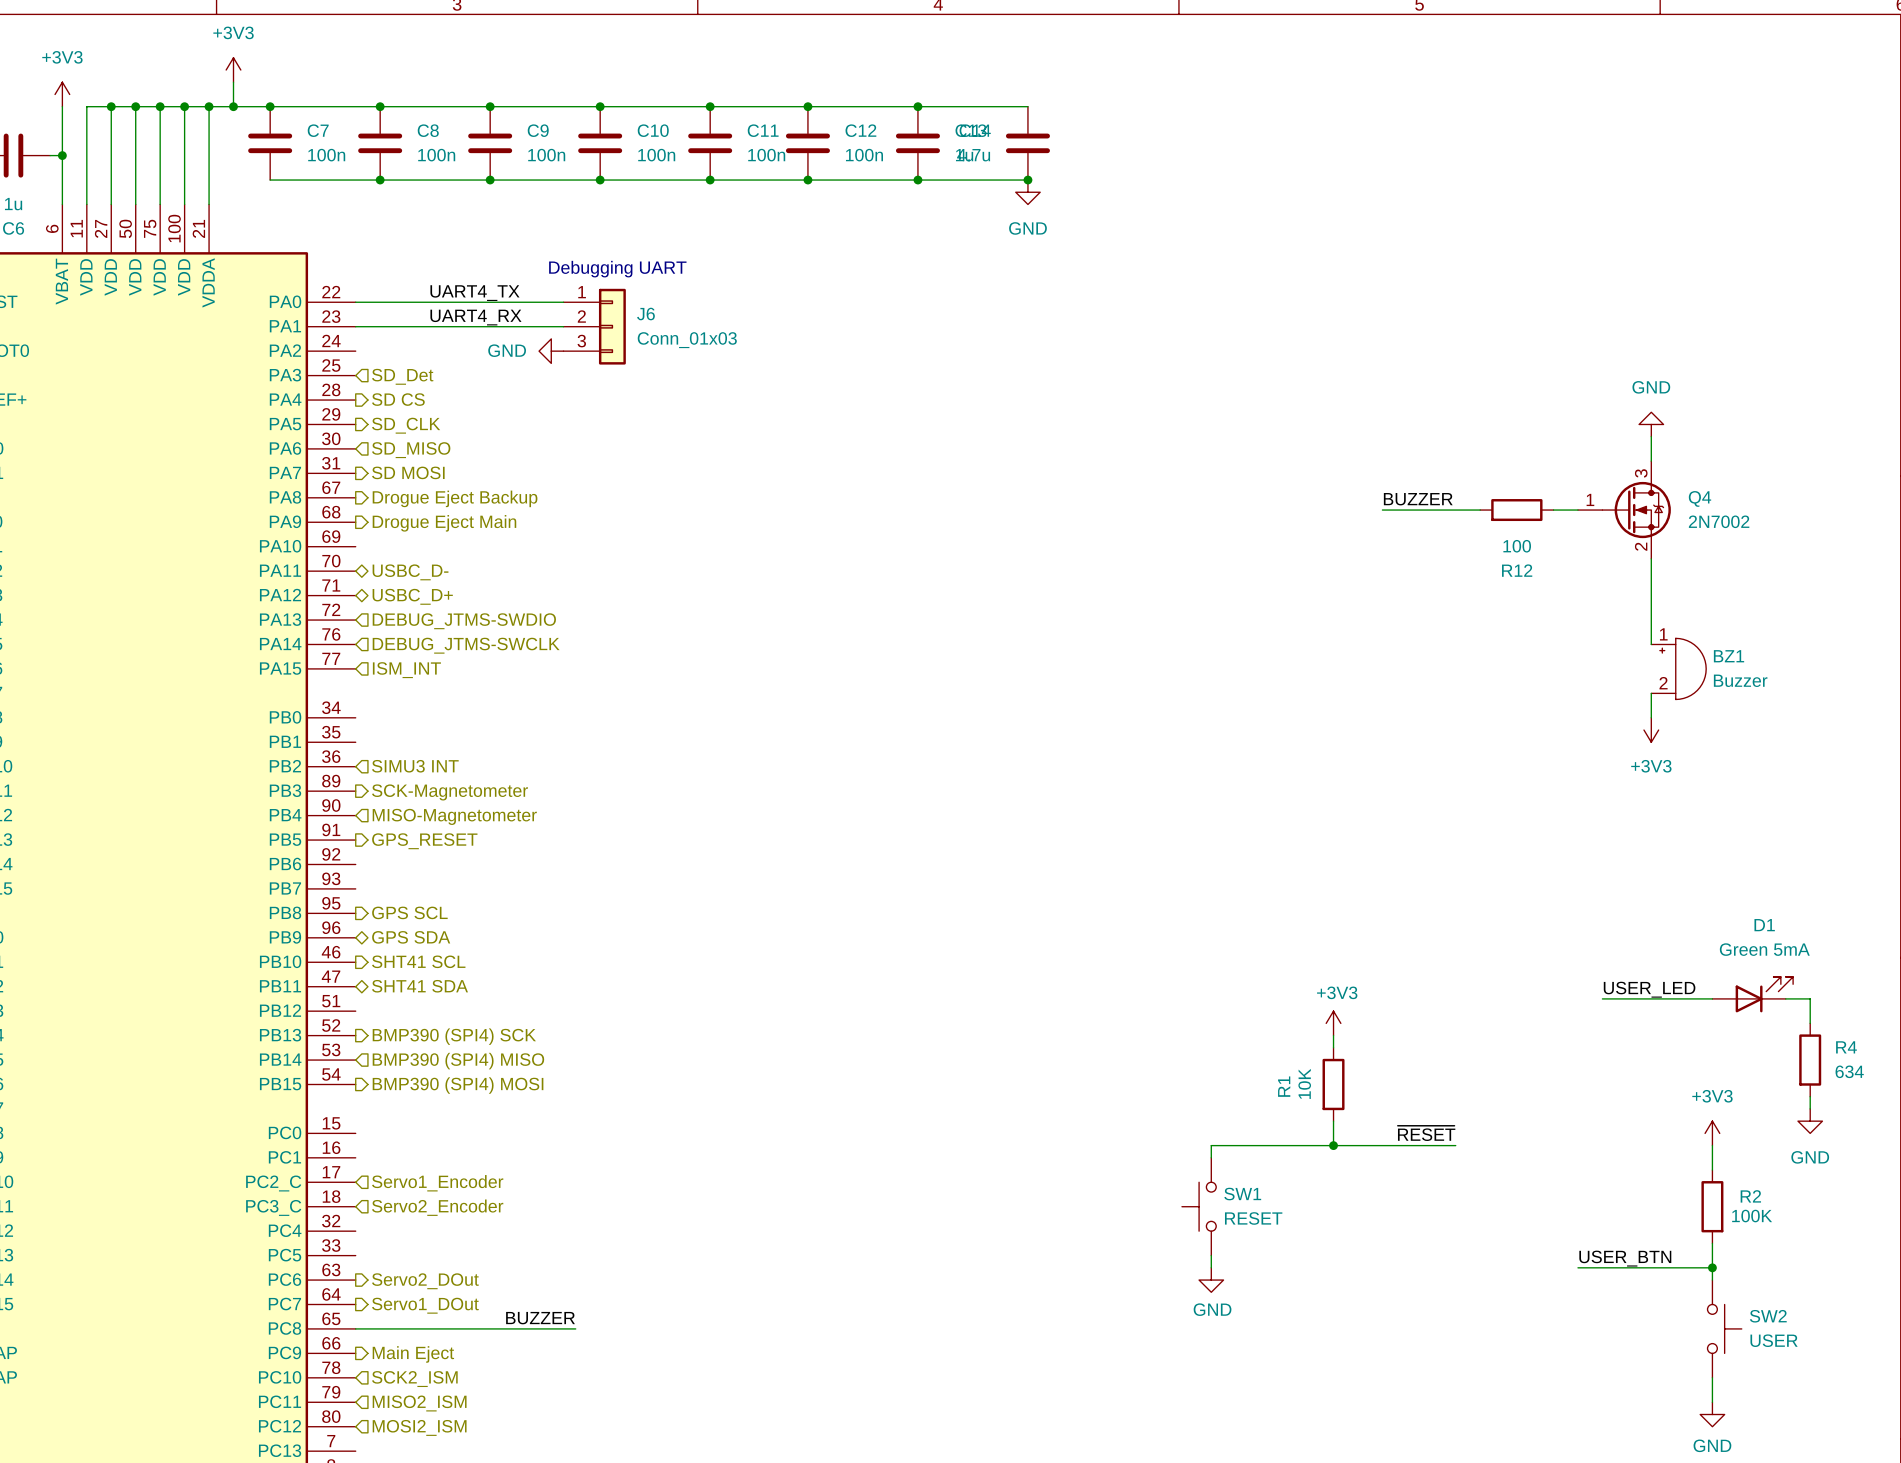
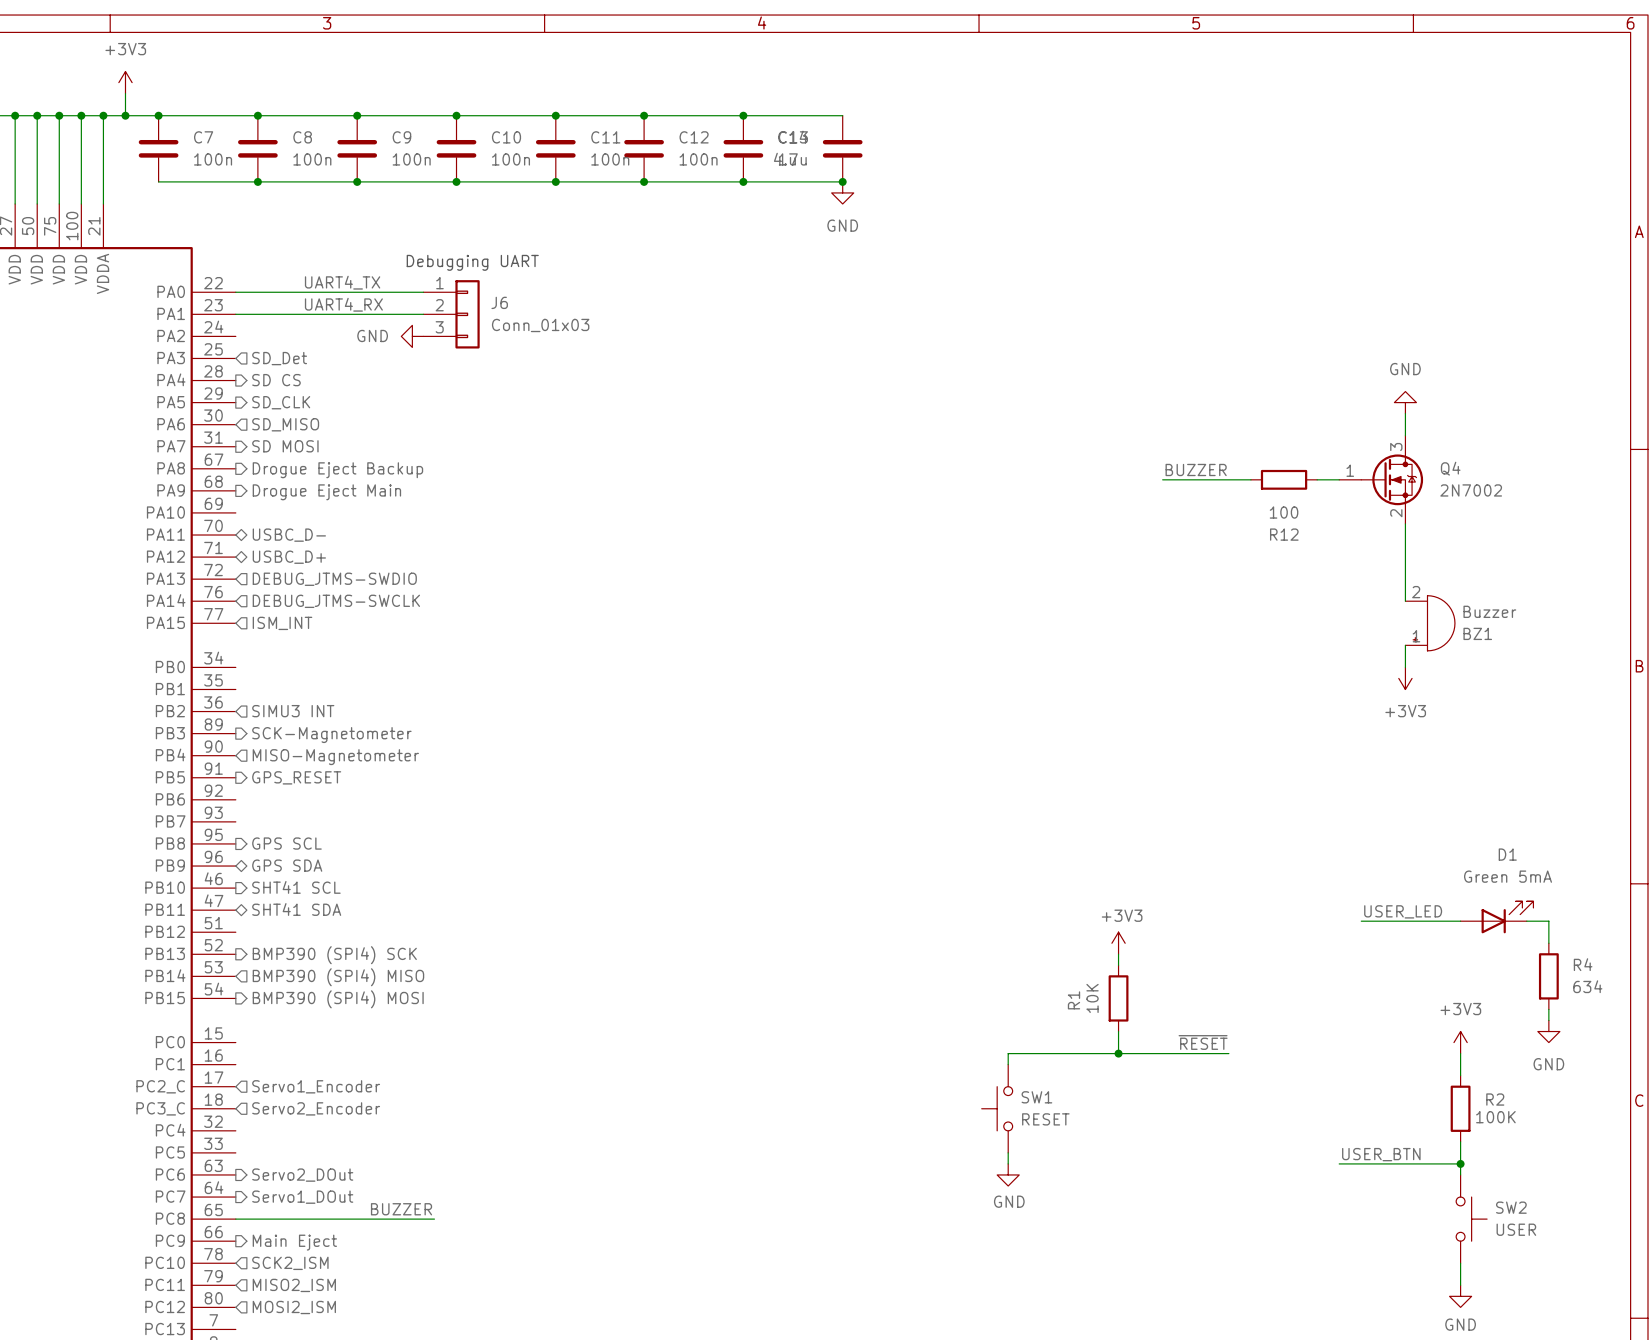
BZ1 flip: as is (1683, 668) -> up-down (1434, 623)

